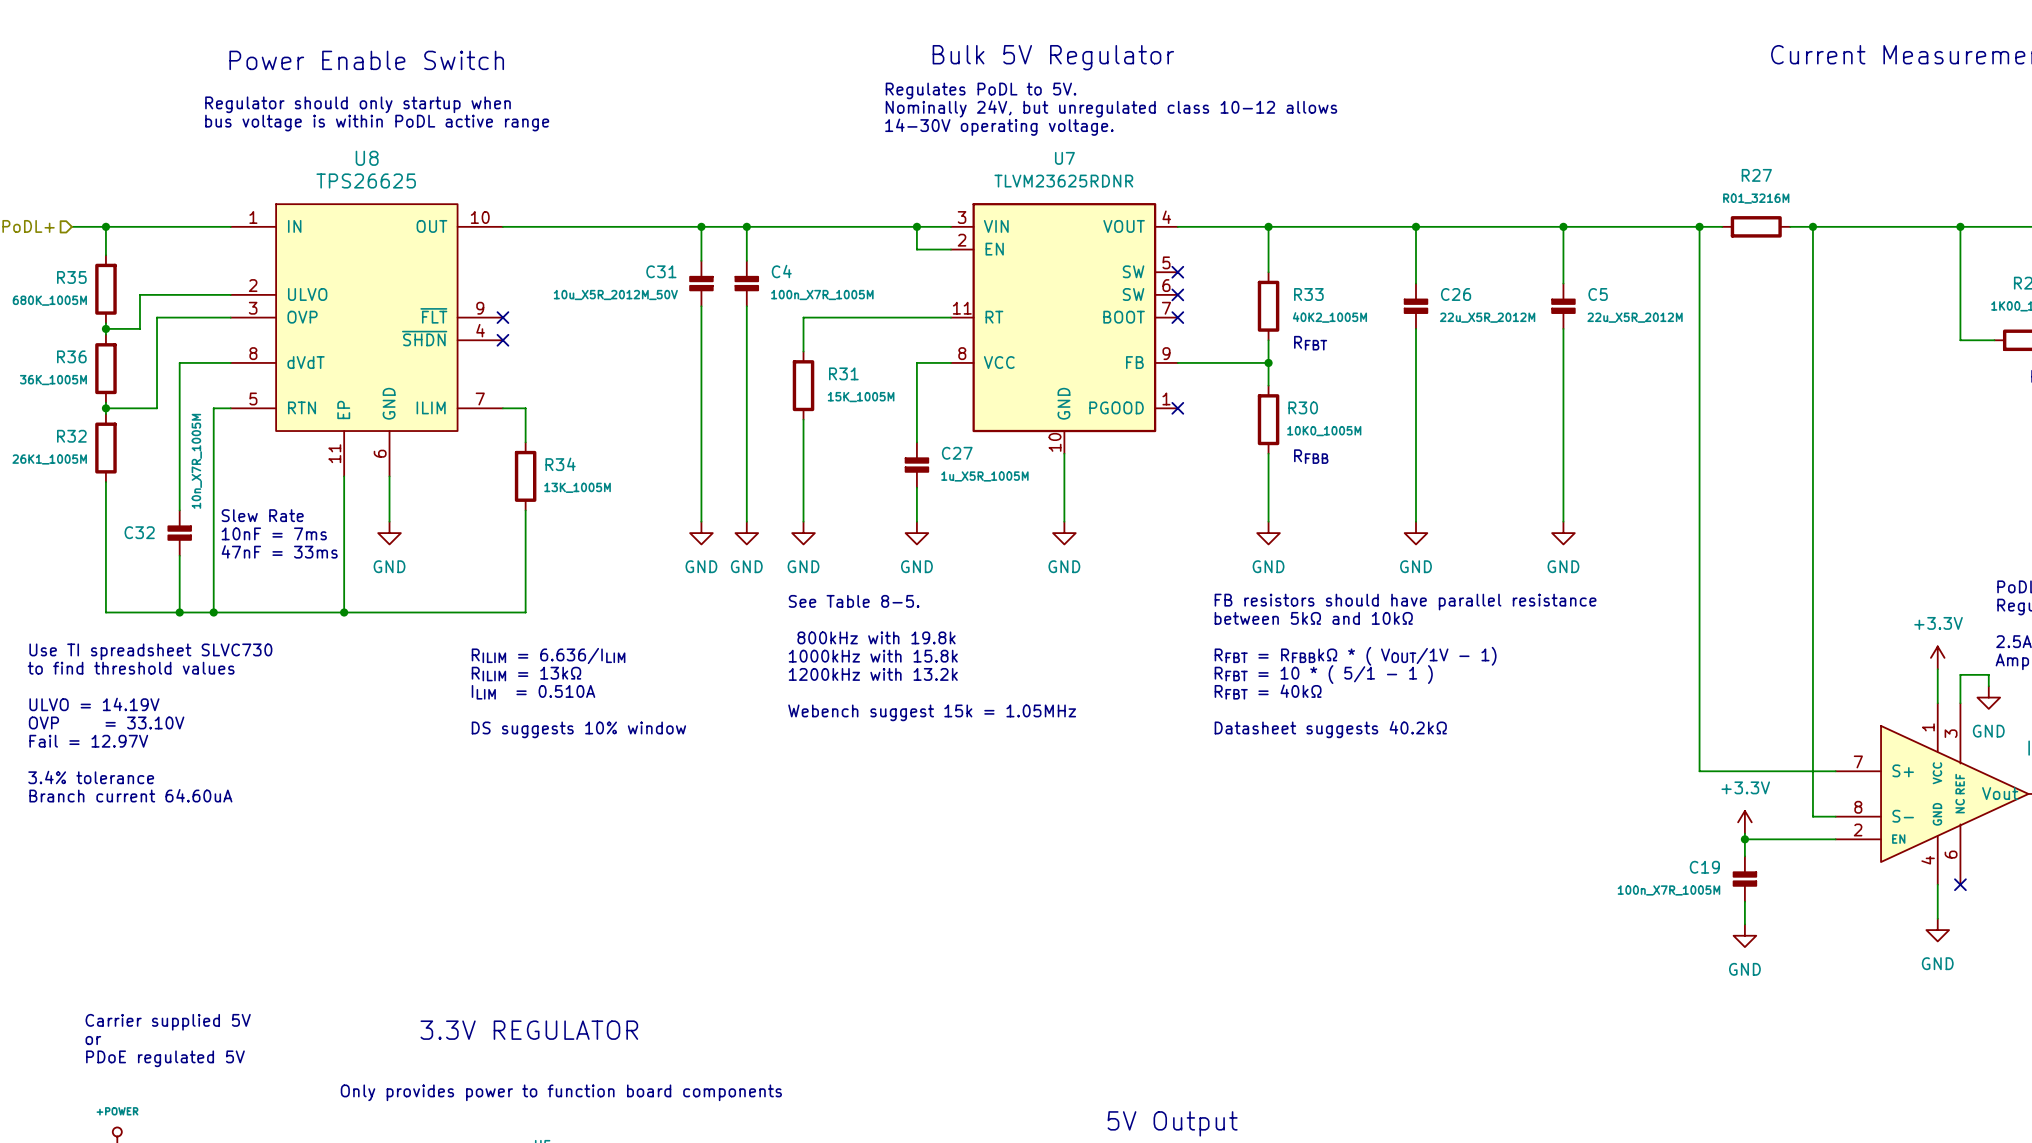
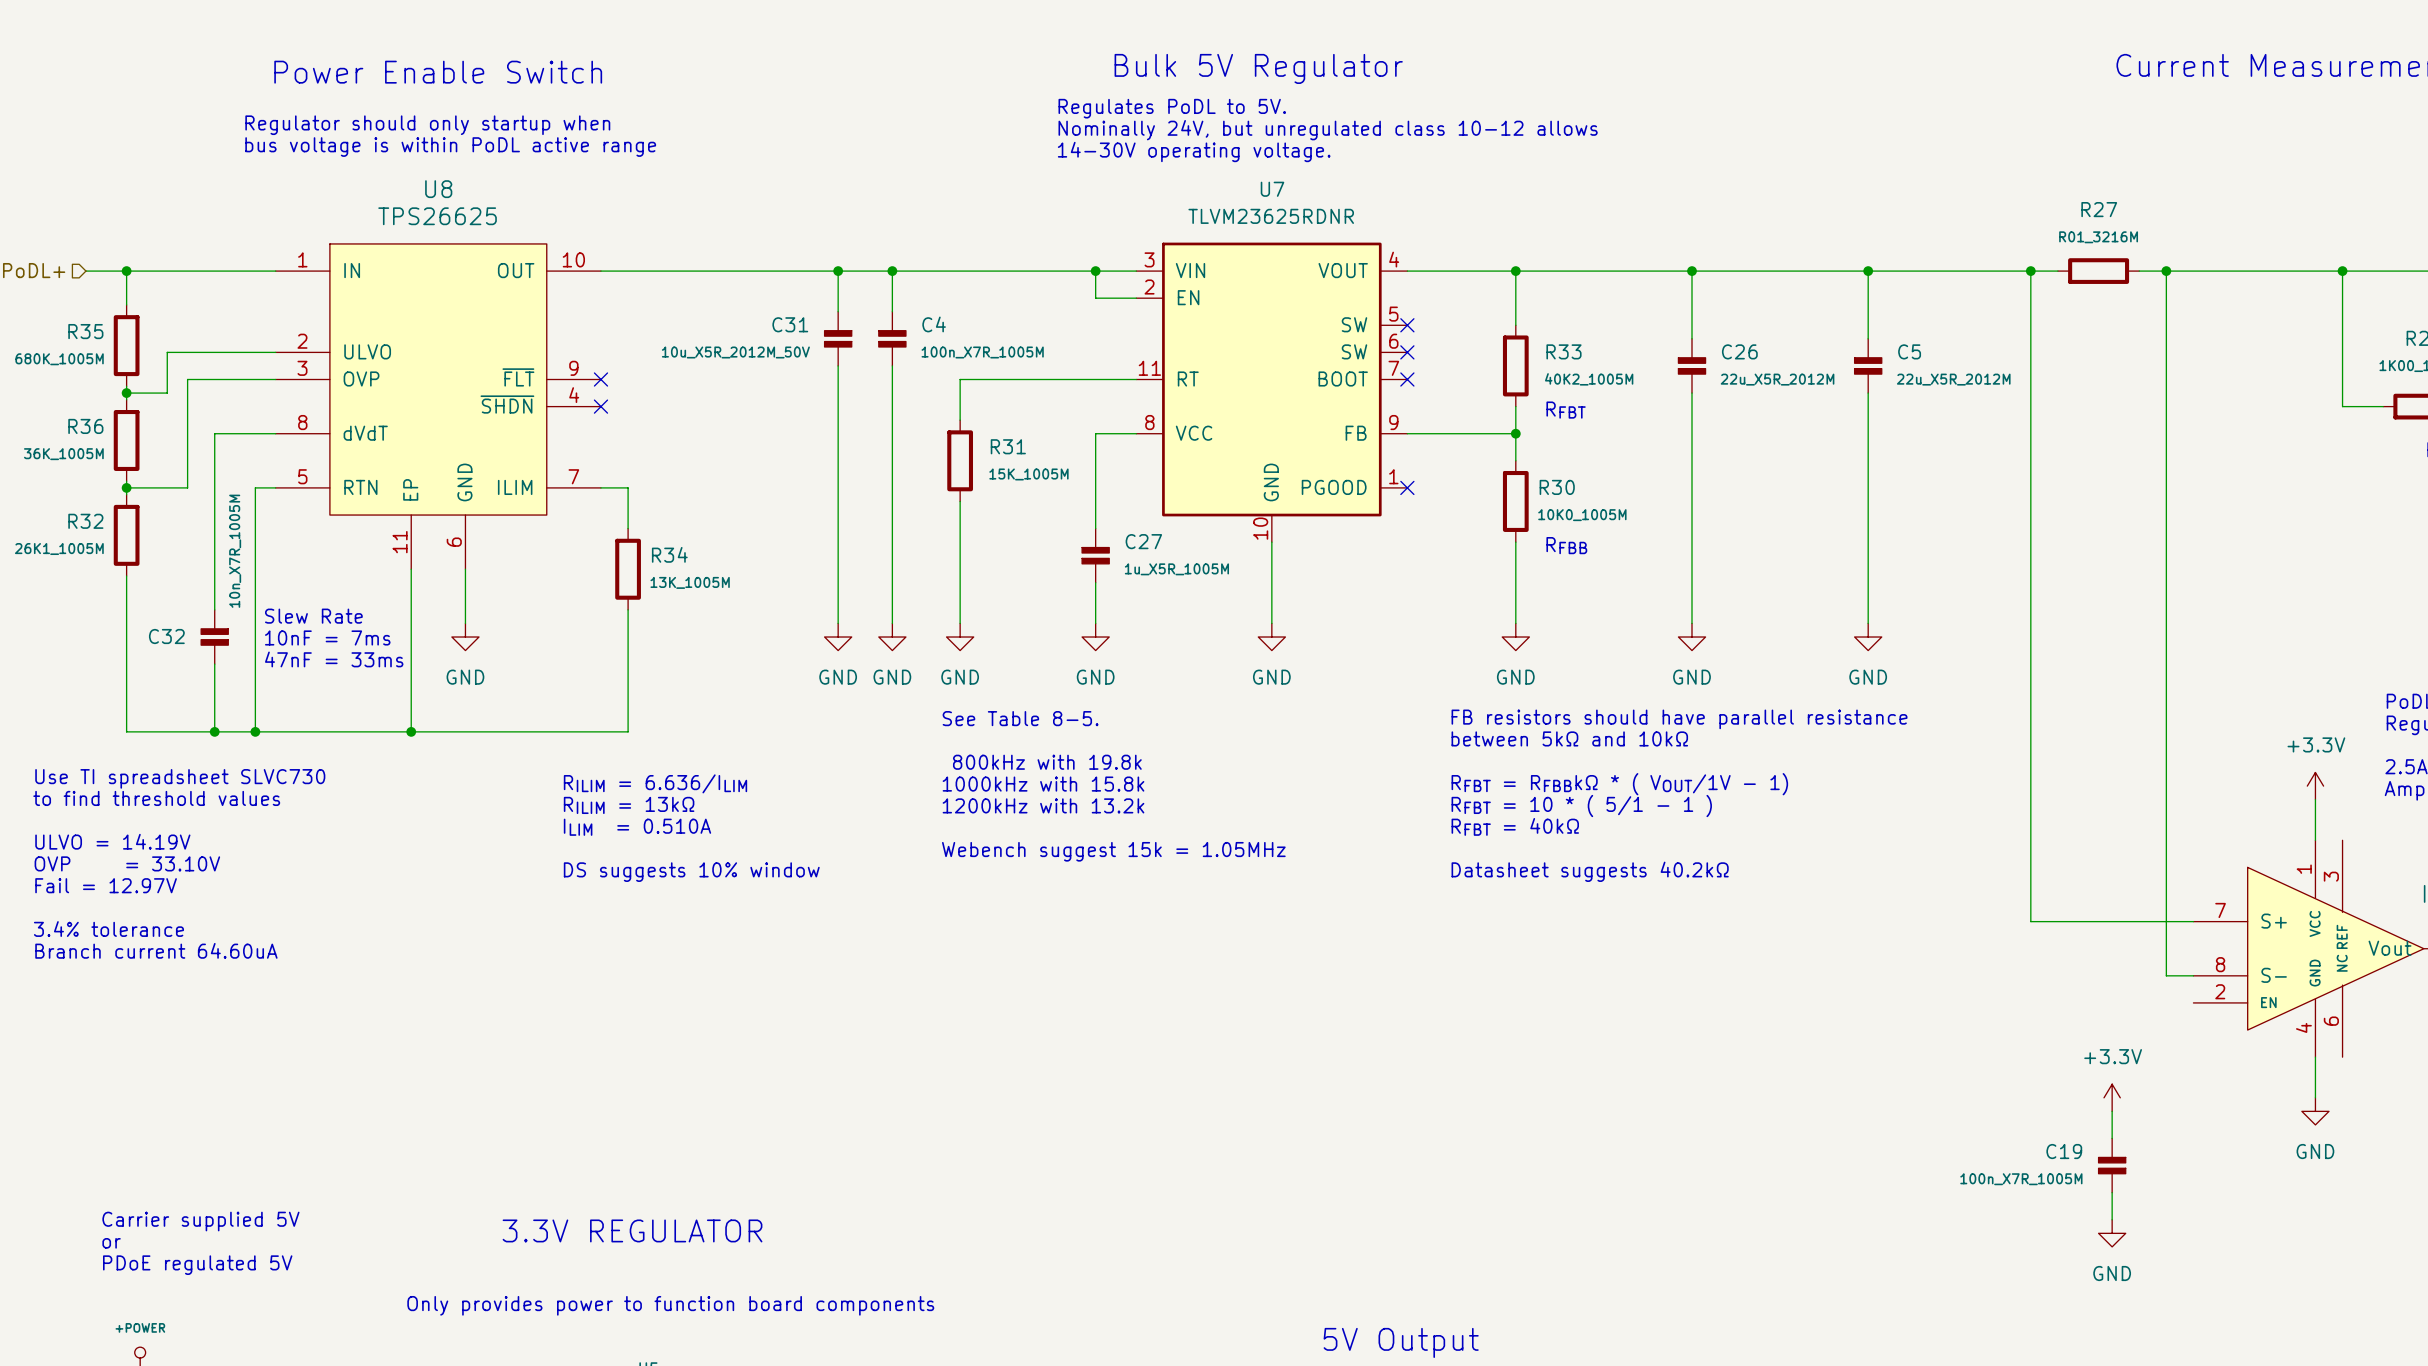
wire: (1988, 686) (1988, 674) (1960, 674) (1960, 703) -> none
power symbol: GND (1988, 697) -> none
power symbol position: +3.3V (1744, 822) -> +3.3V (2112, 1097)
wire: (1744, 833) (1744, 856) -> (2112, 1111) (2112, 1138)
wire: (1744, 839) (1835, 839) -> none
junction: (1744, 839) -> none
C19 position: (1744, 879) -> (2112, 1165)
no-connect mark: (1960, 884) -> none
wire: (1744, 901) (1744, 924) -> (2112, 1192) (2112, 1219)
power symbol position: GND (1744, 935) -> GND (2112, 1233)

